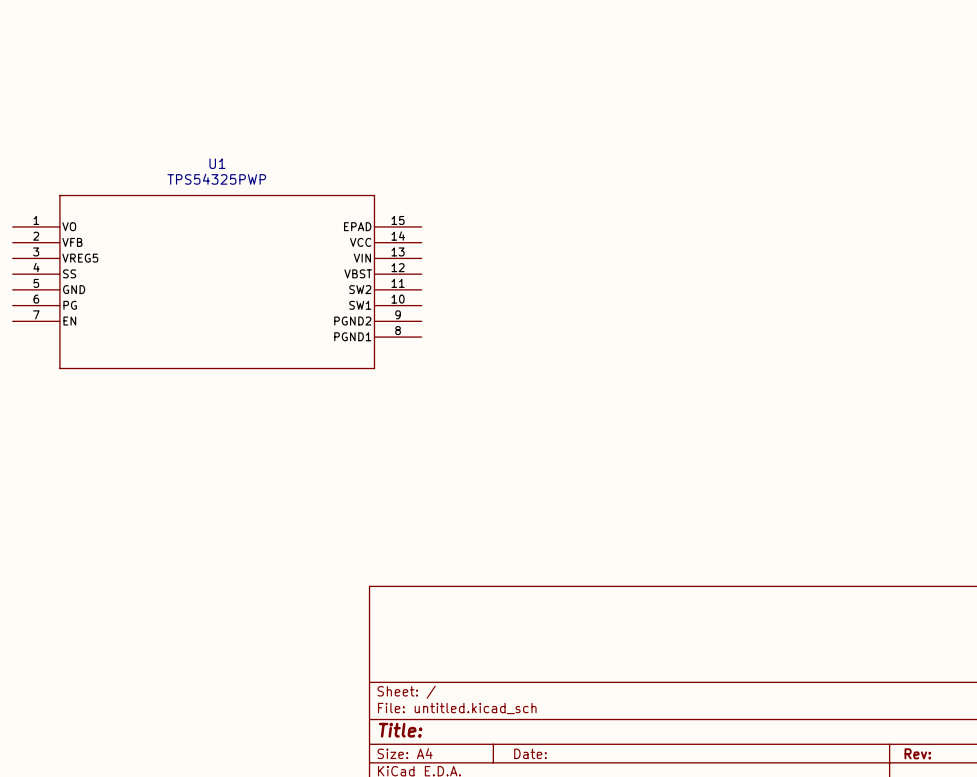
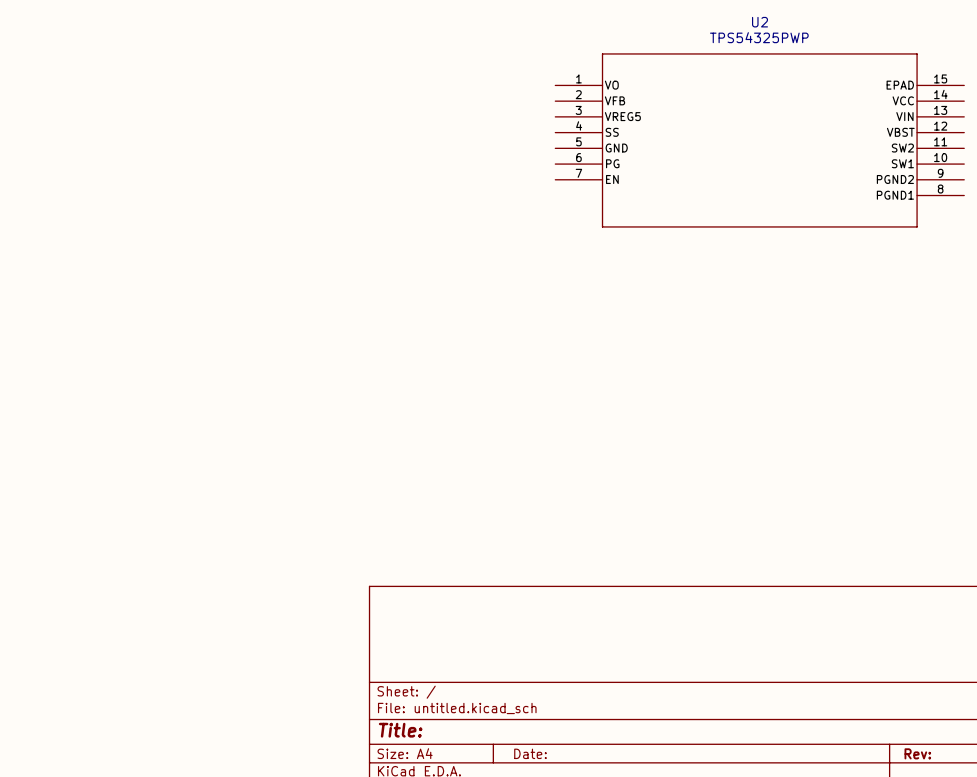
U2: none -> TPS54325PWP (759, 140)
U1: TPS54325PWP (217, 282) -> none

